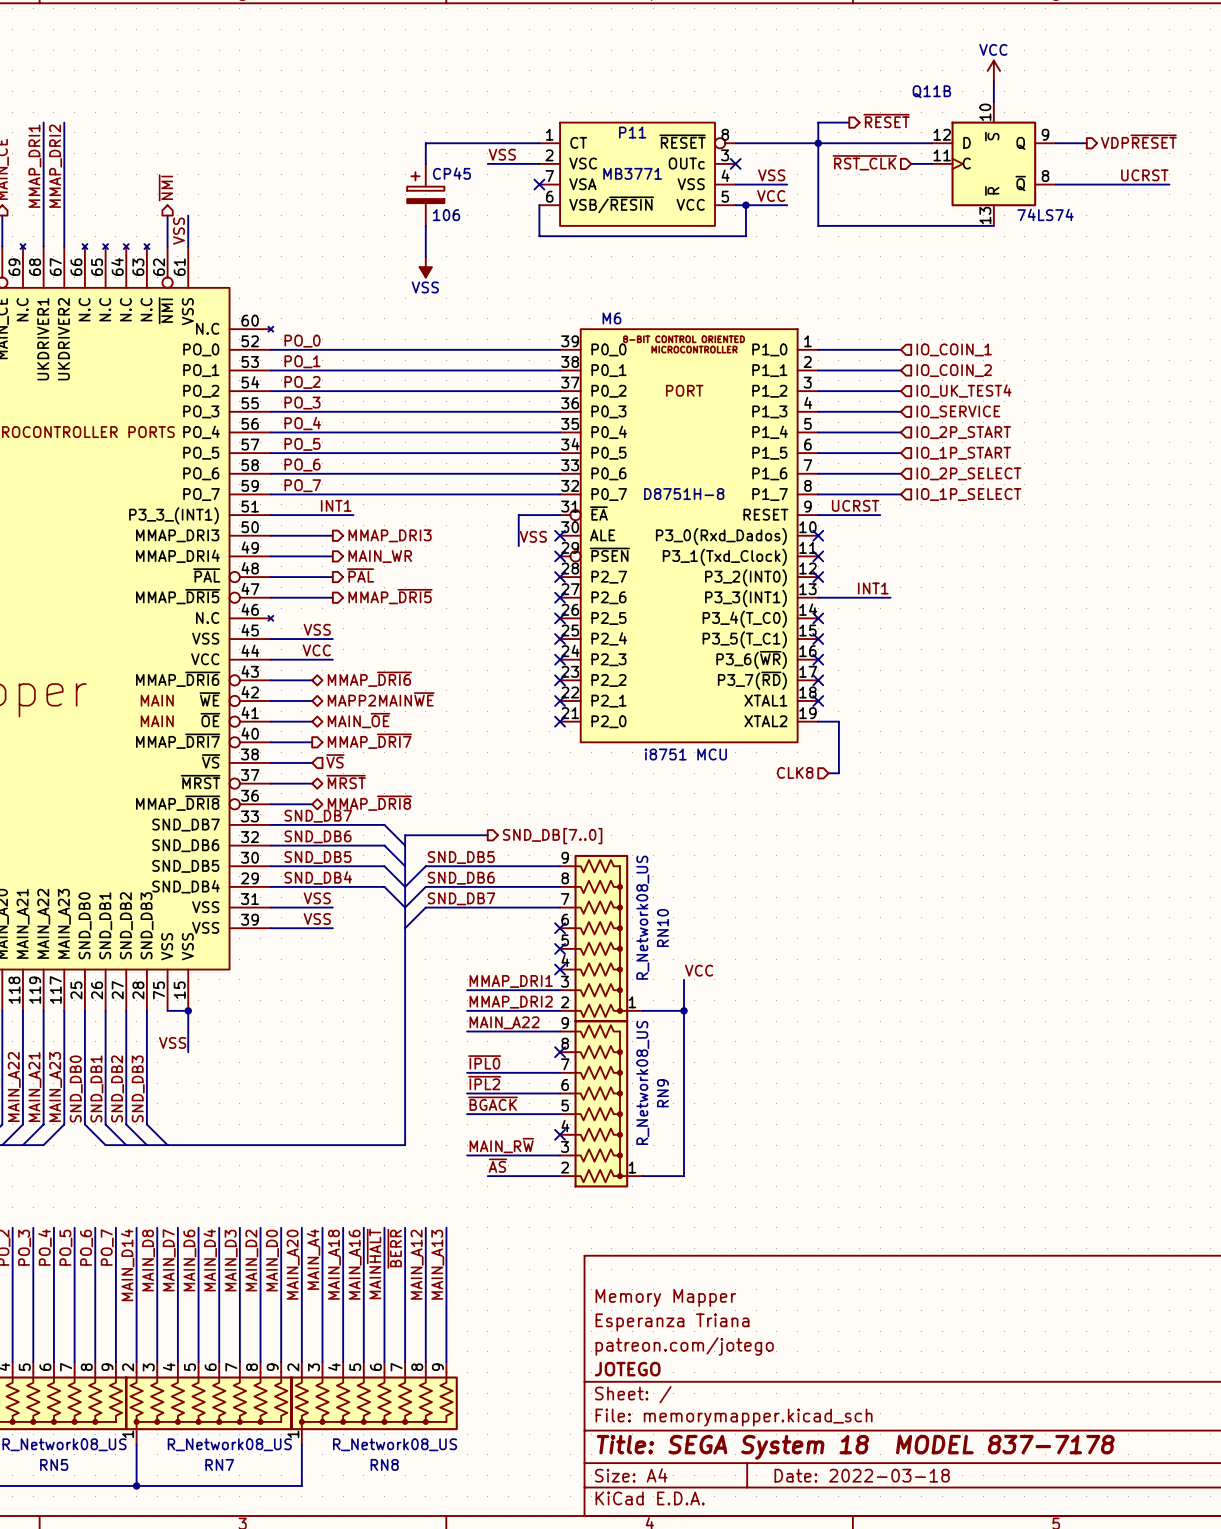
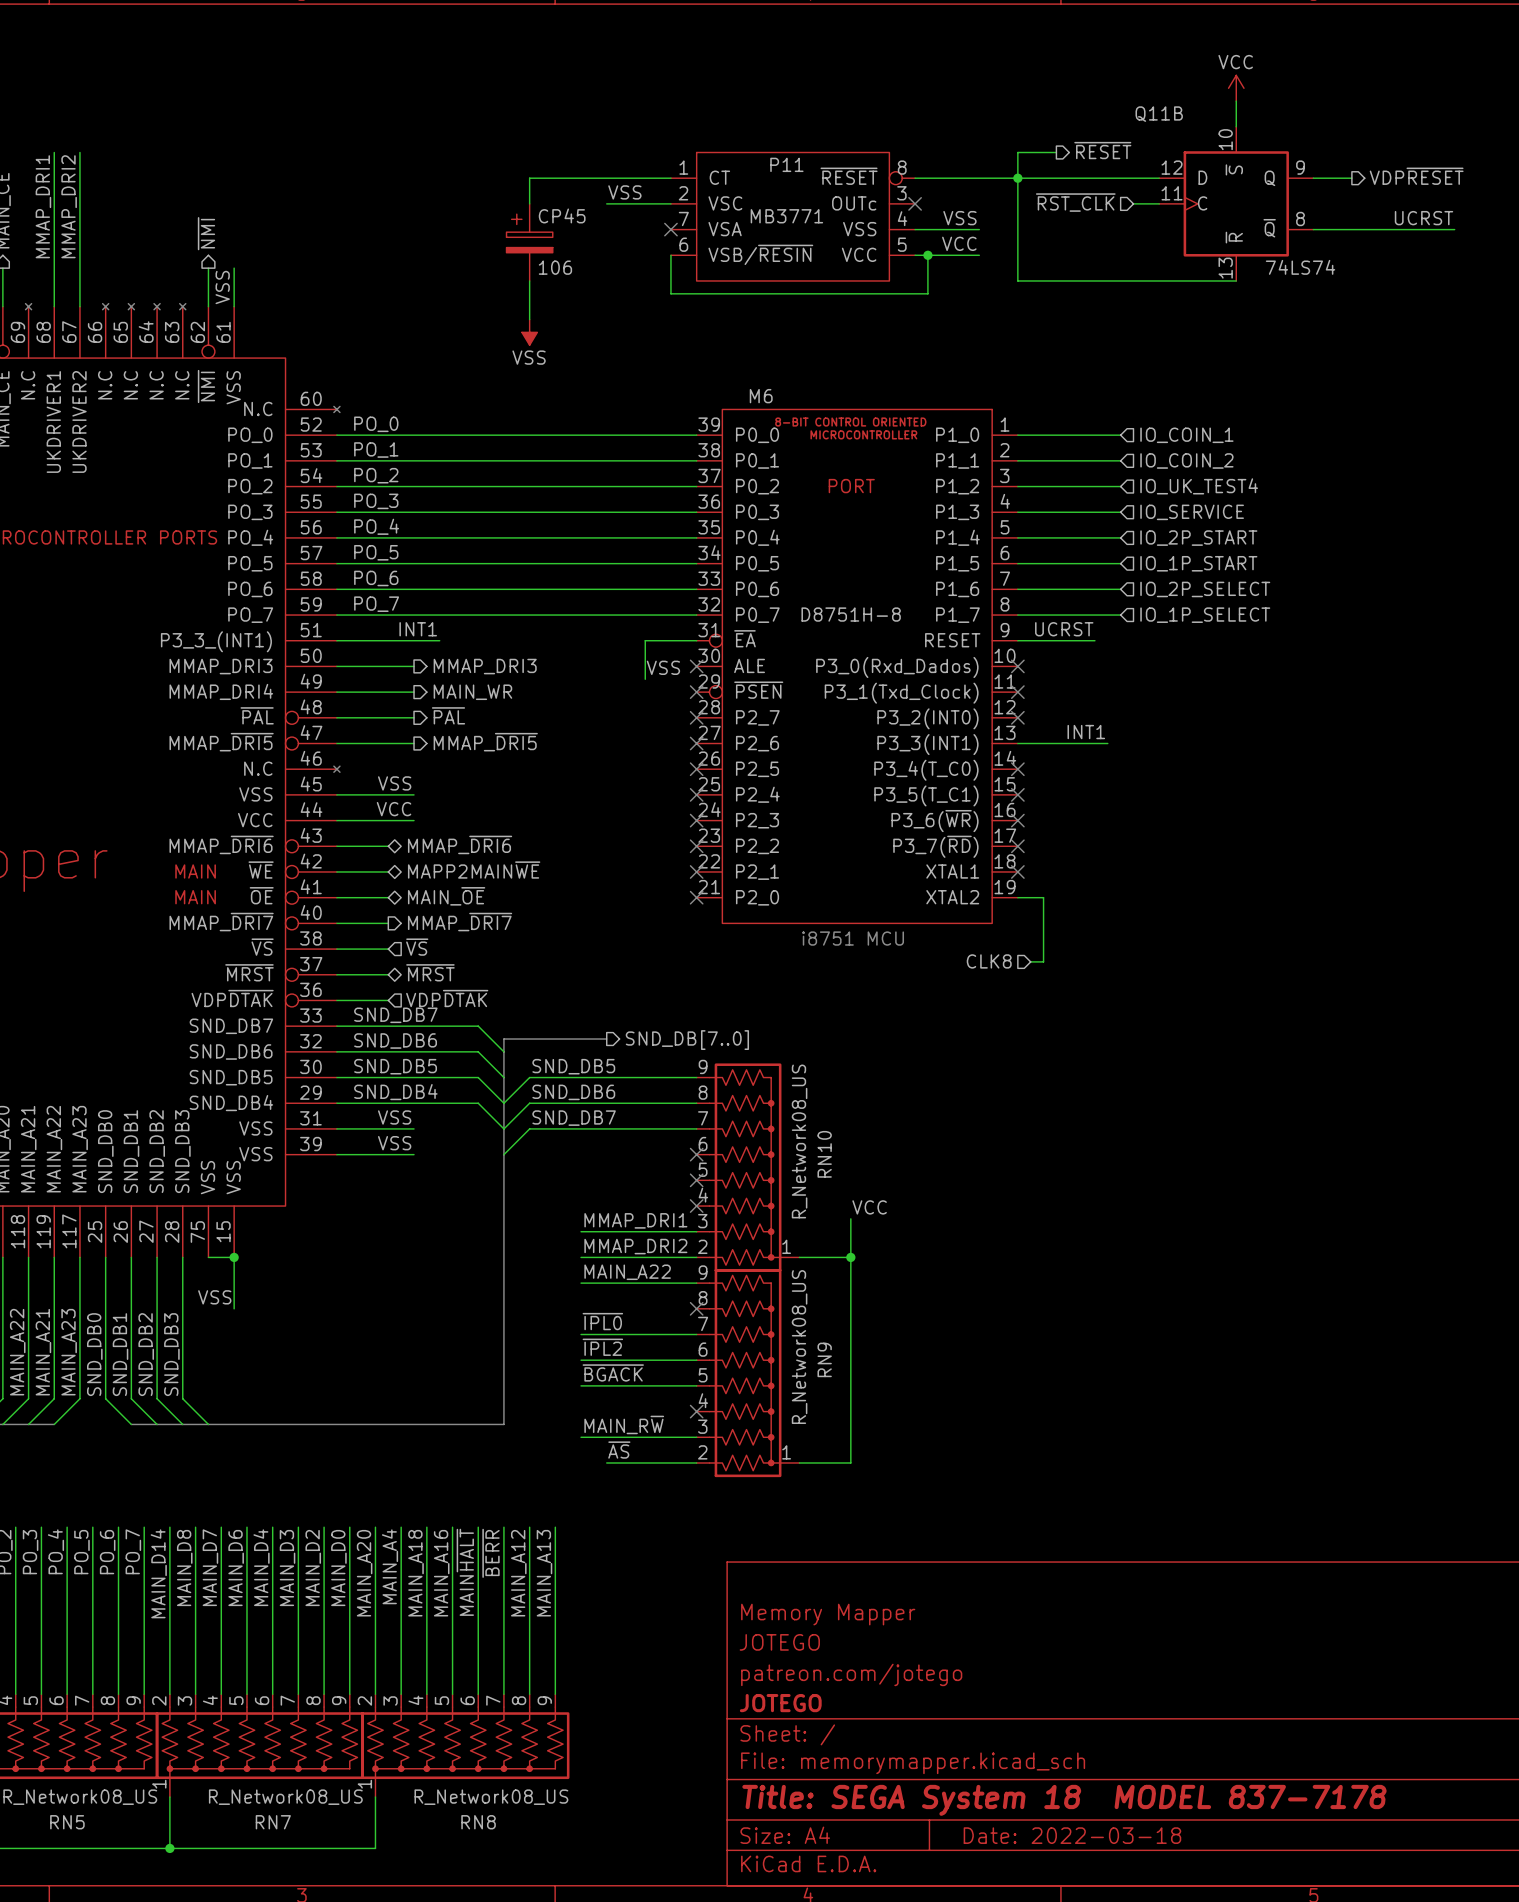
part pin name: MMAP_~{DRI8} (178, 803) -> VDP~{DTAK} (232, 998)
hierarchical label shape: bidirectional (369, 803) -> input (447, 998)
hierarchical label: MMAP_~{DRI8} (369, 803) -> VDP~{DTAK} (447, 998)
title block: Esperanza Triana (672, 1322) -> JOTEGO (779, 1642)

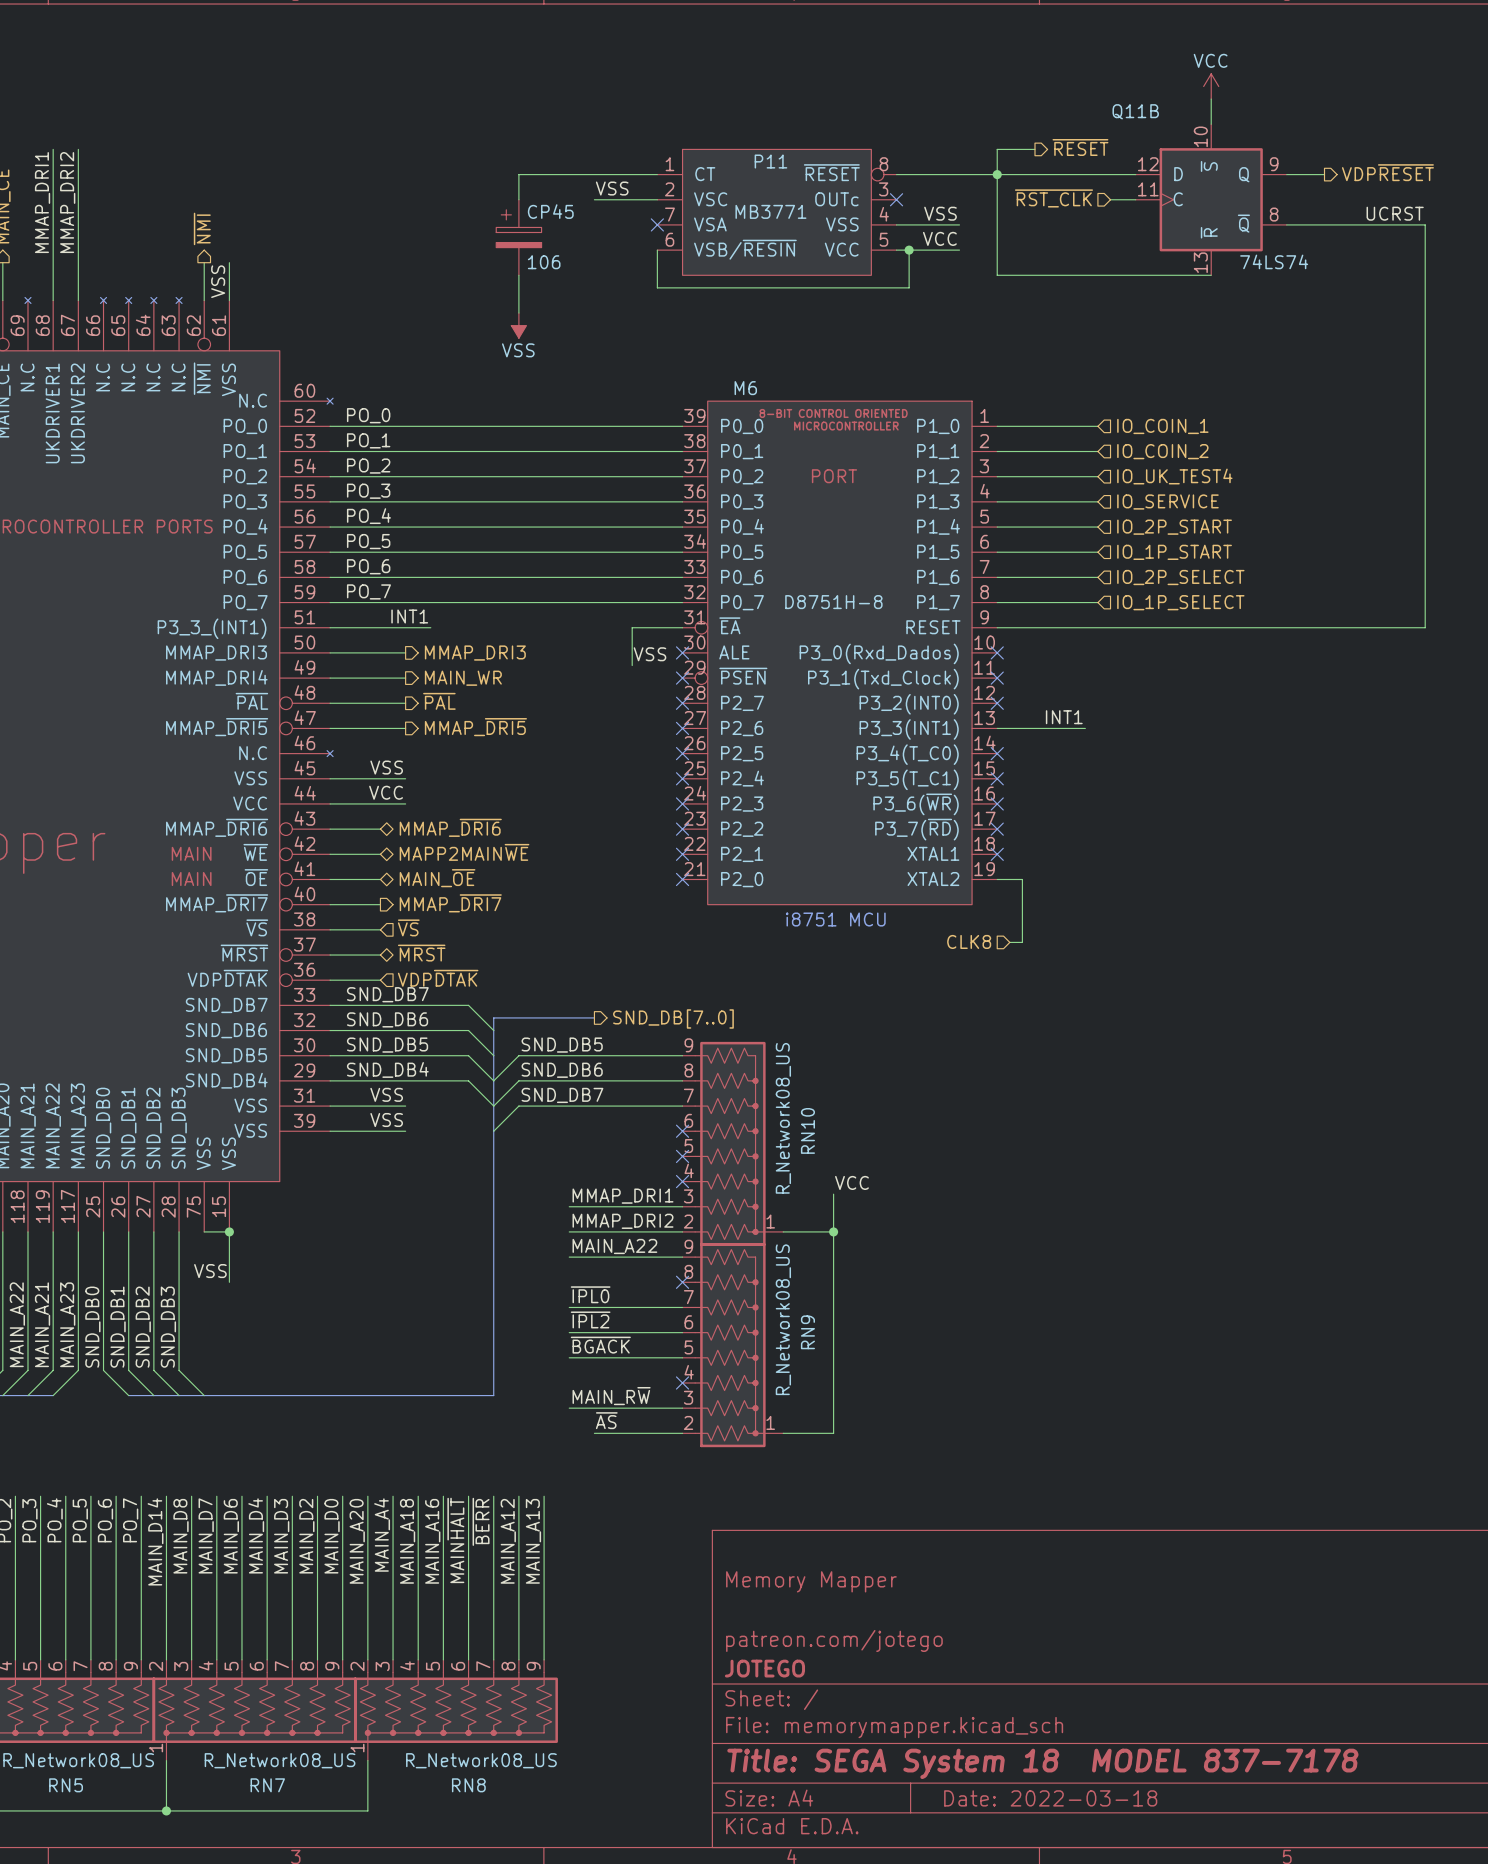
wire: none -> (1425, 224) (1425, 627) (1072, 627)
label: UCRST (1064, 629) -> none
title block: JOTEGO (779, 1642) -> none

